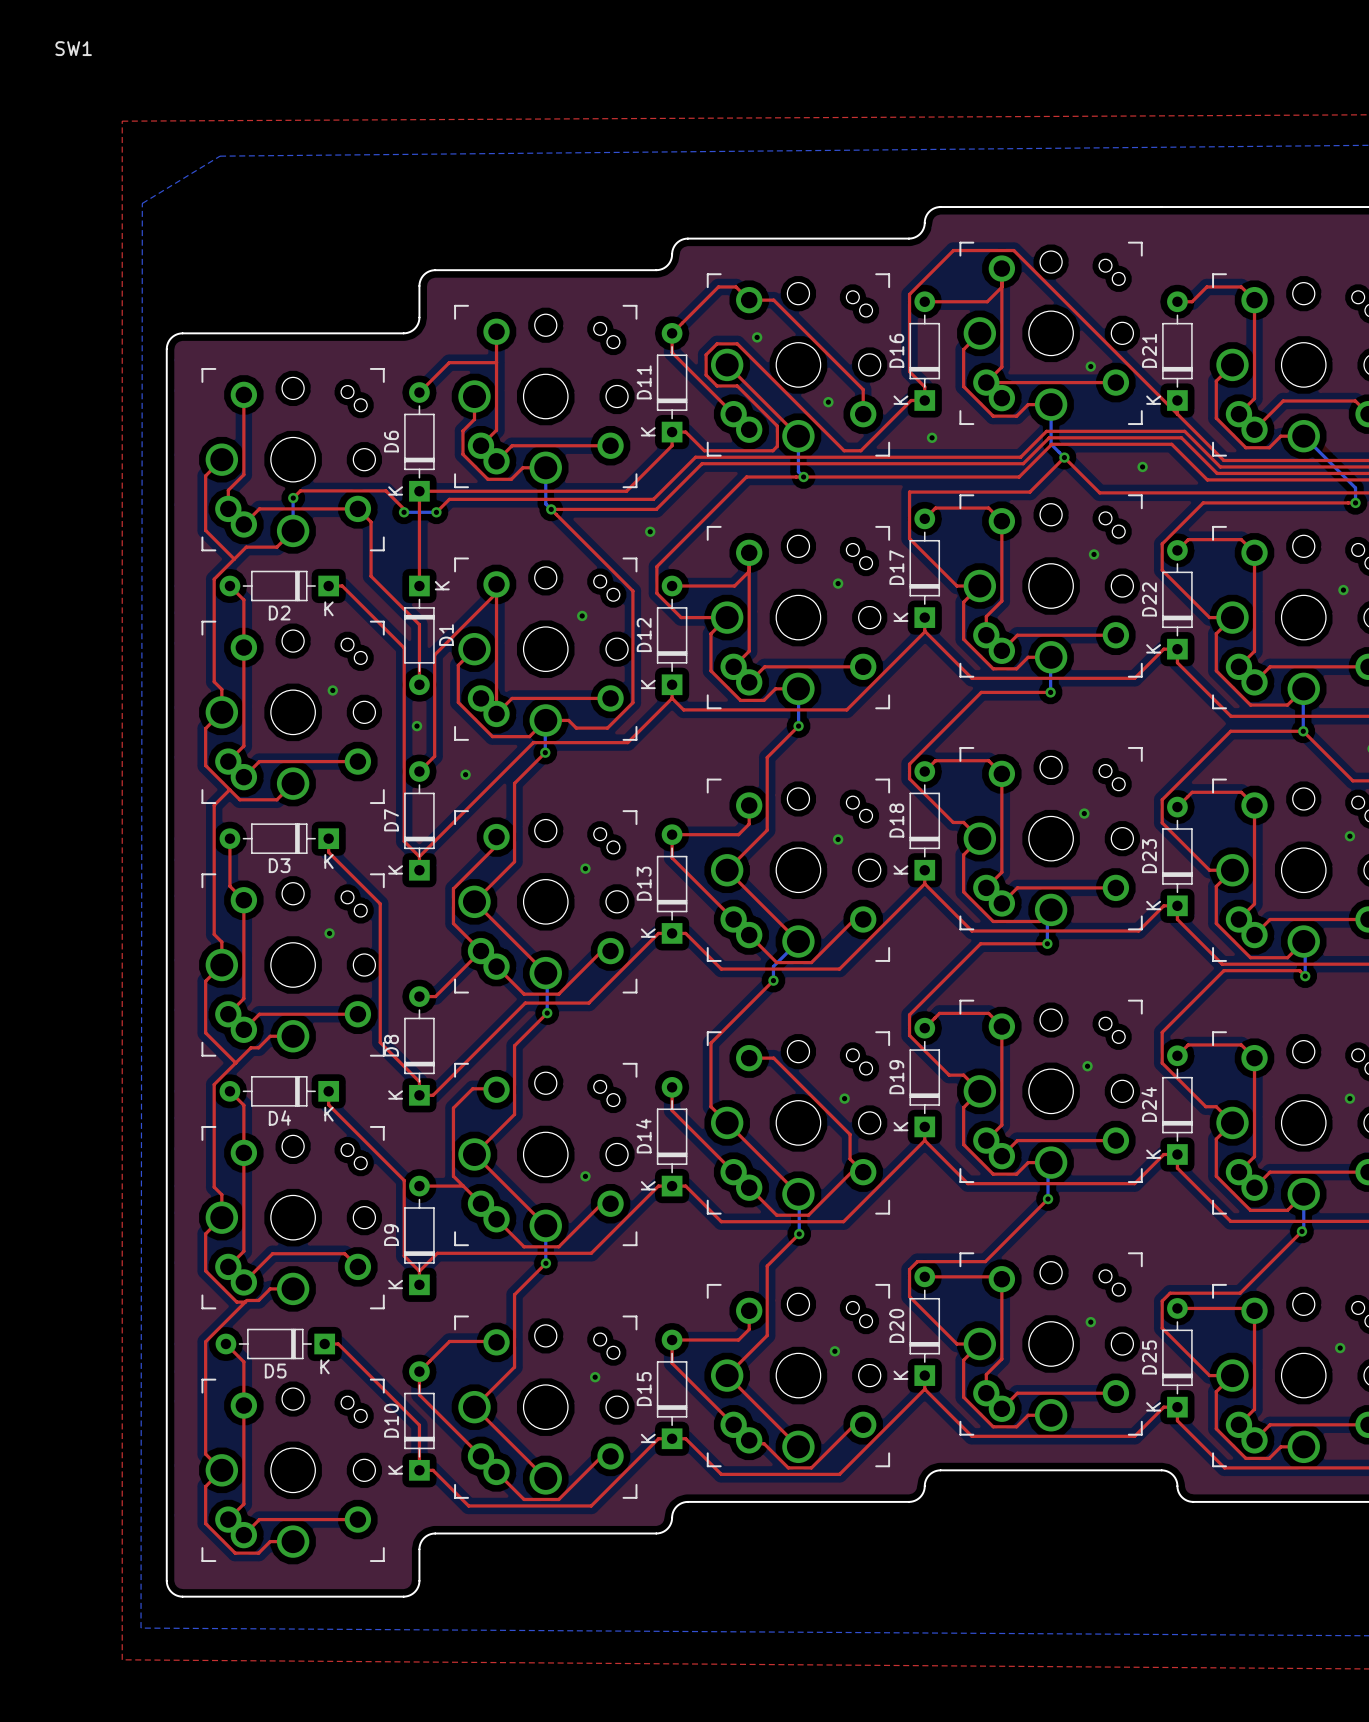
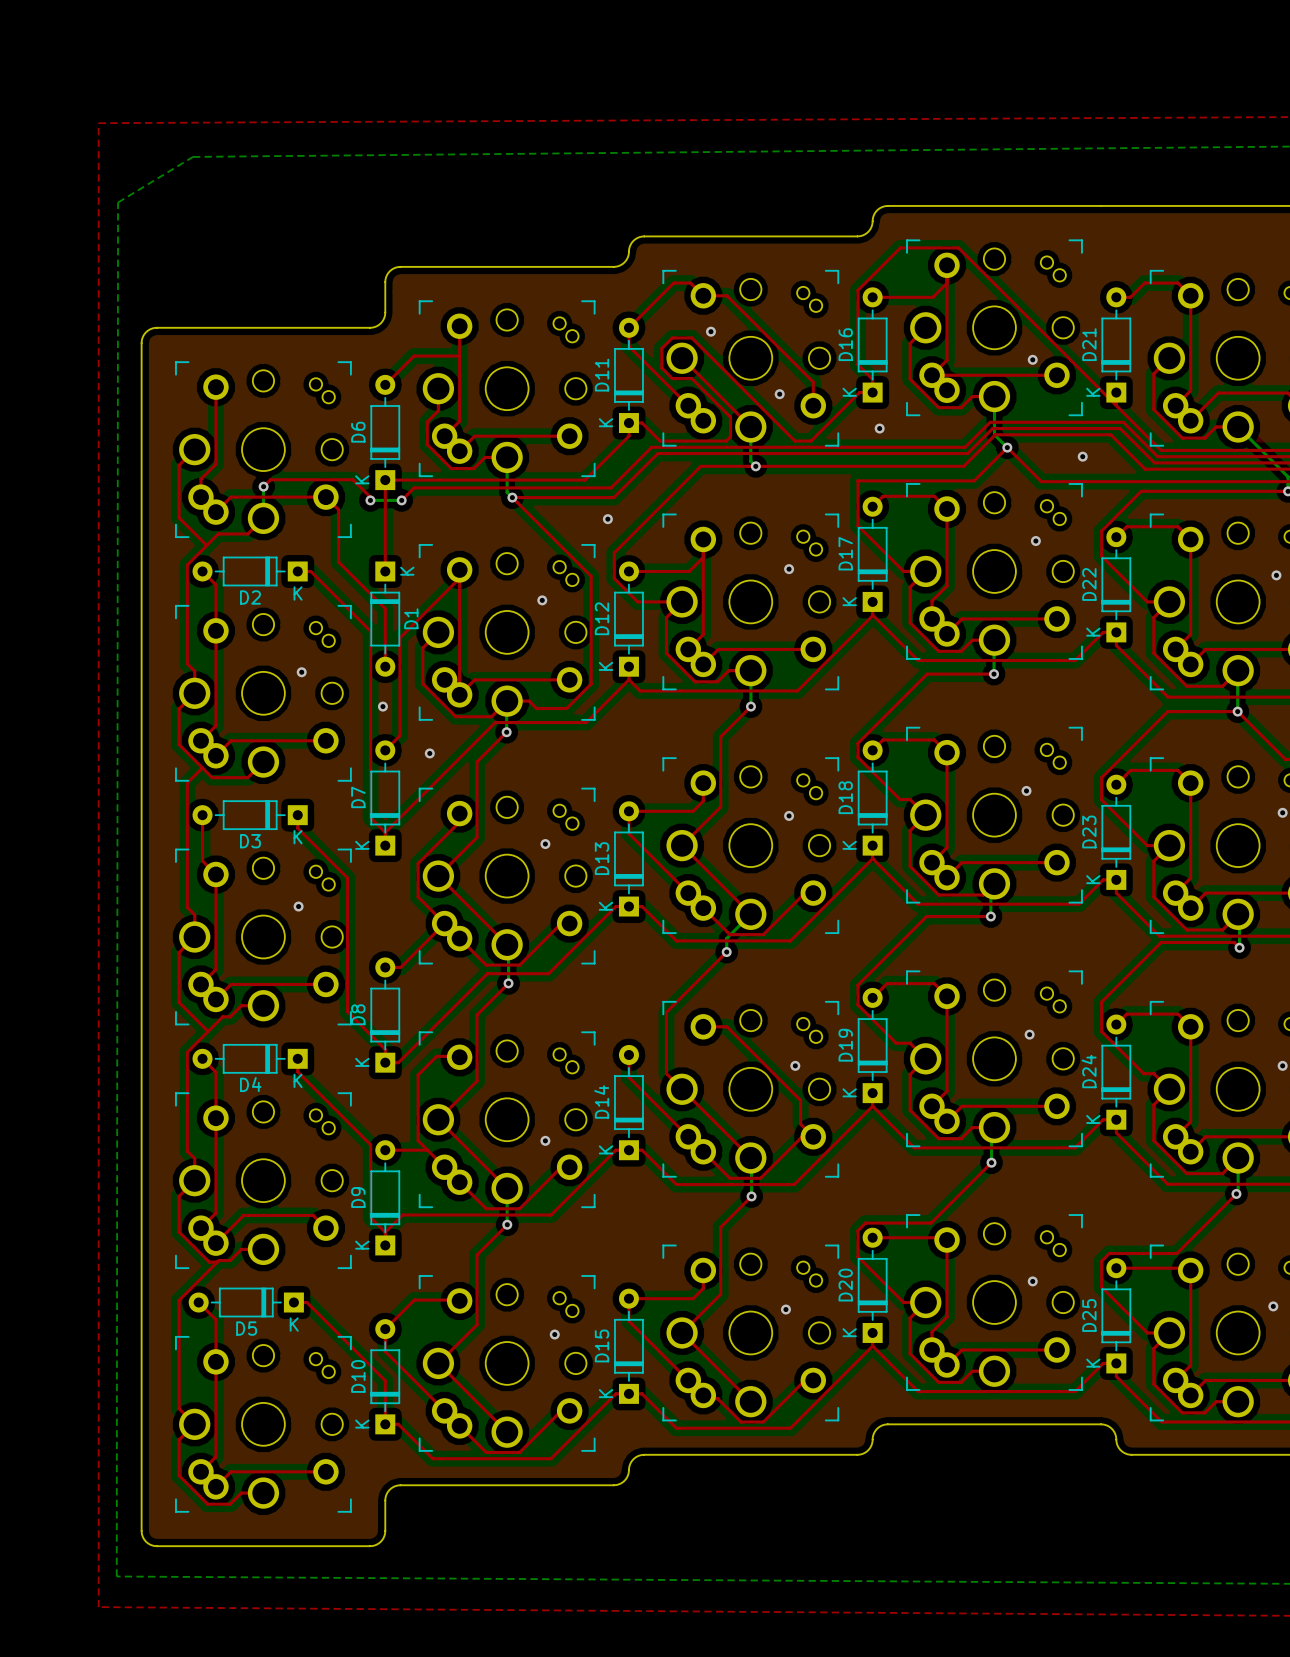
drawing: [55, 41, 92, 57] -> none

